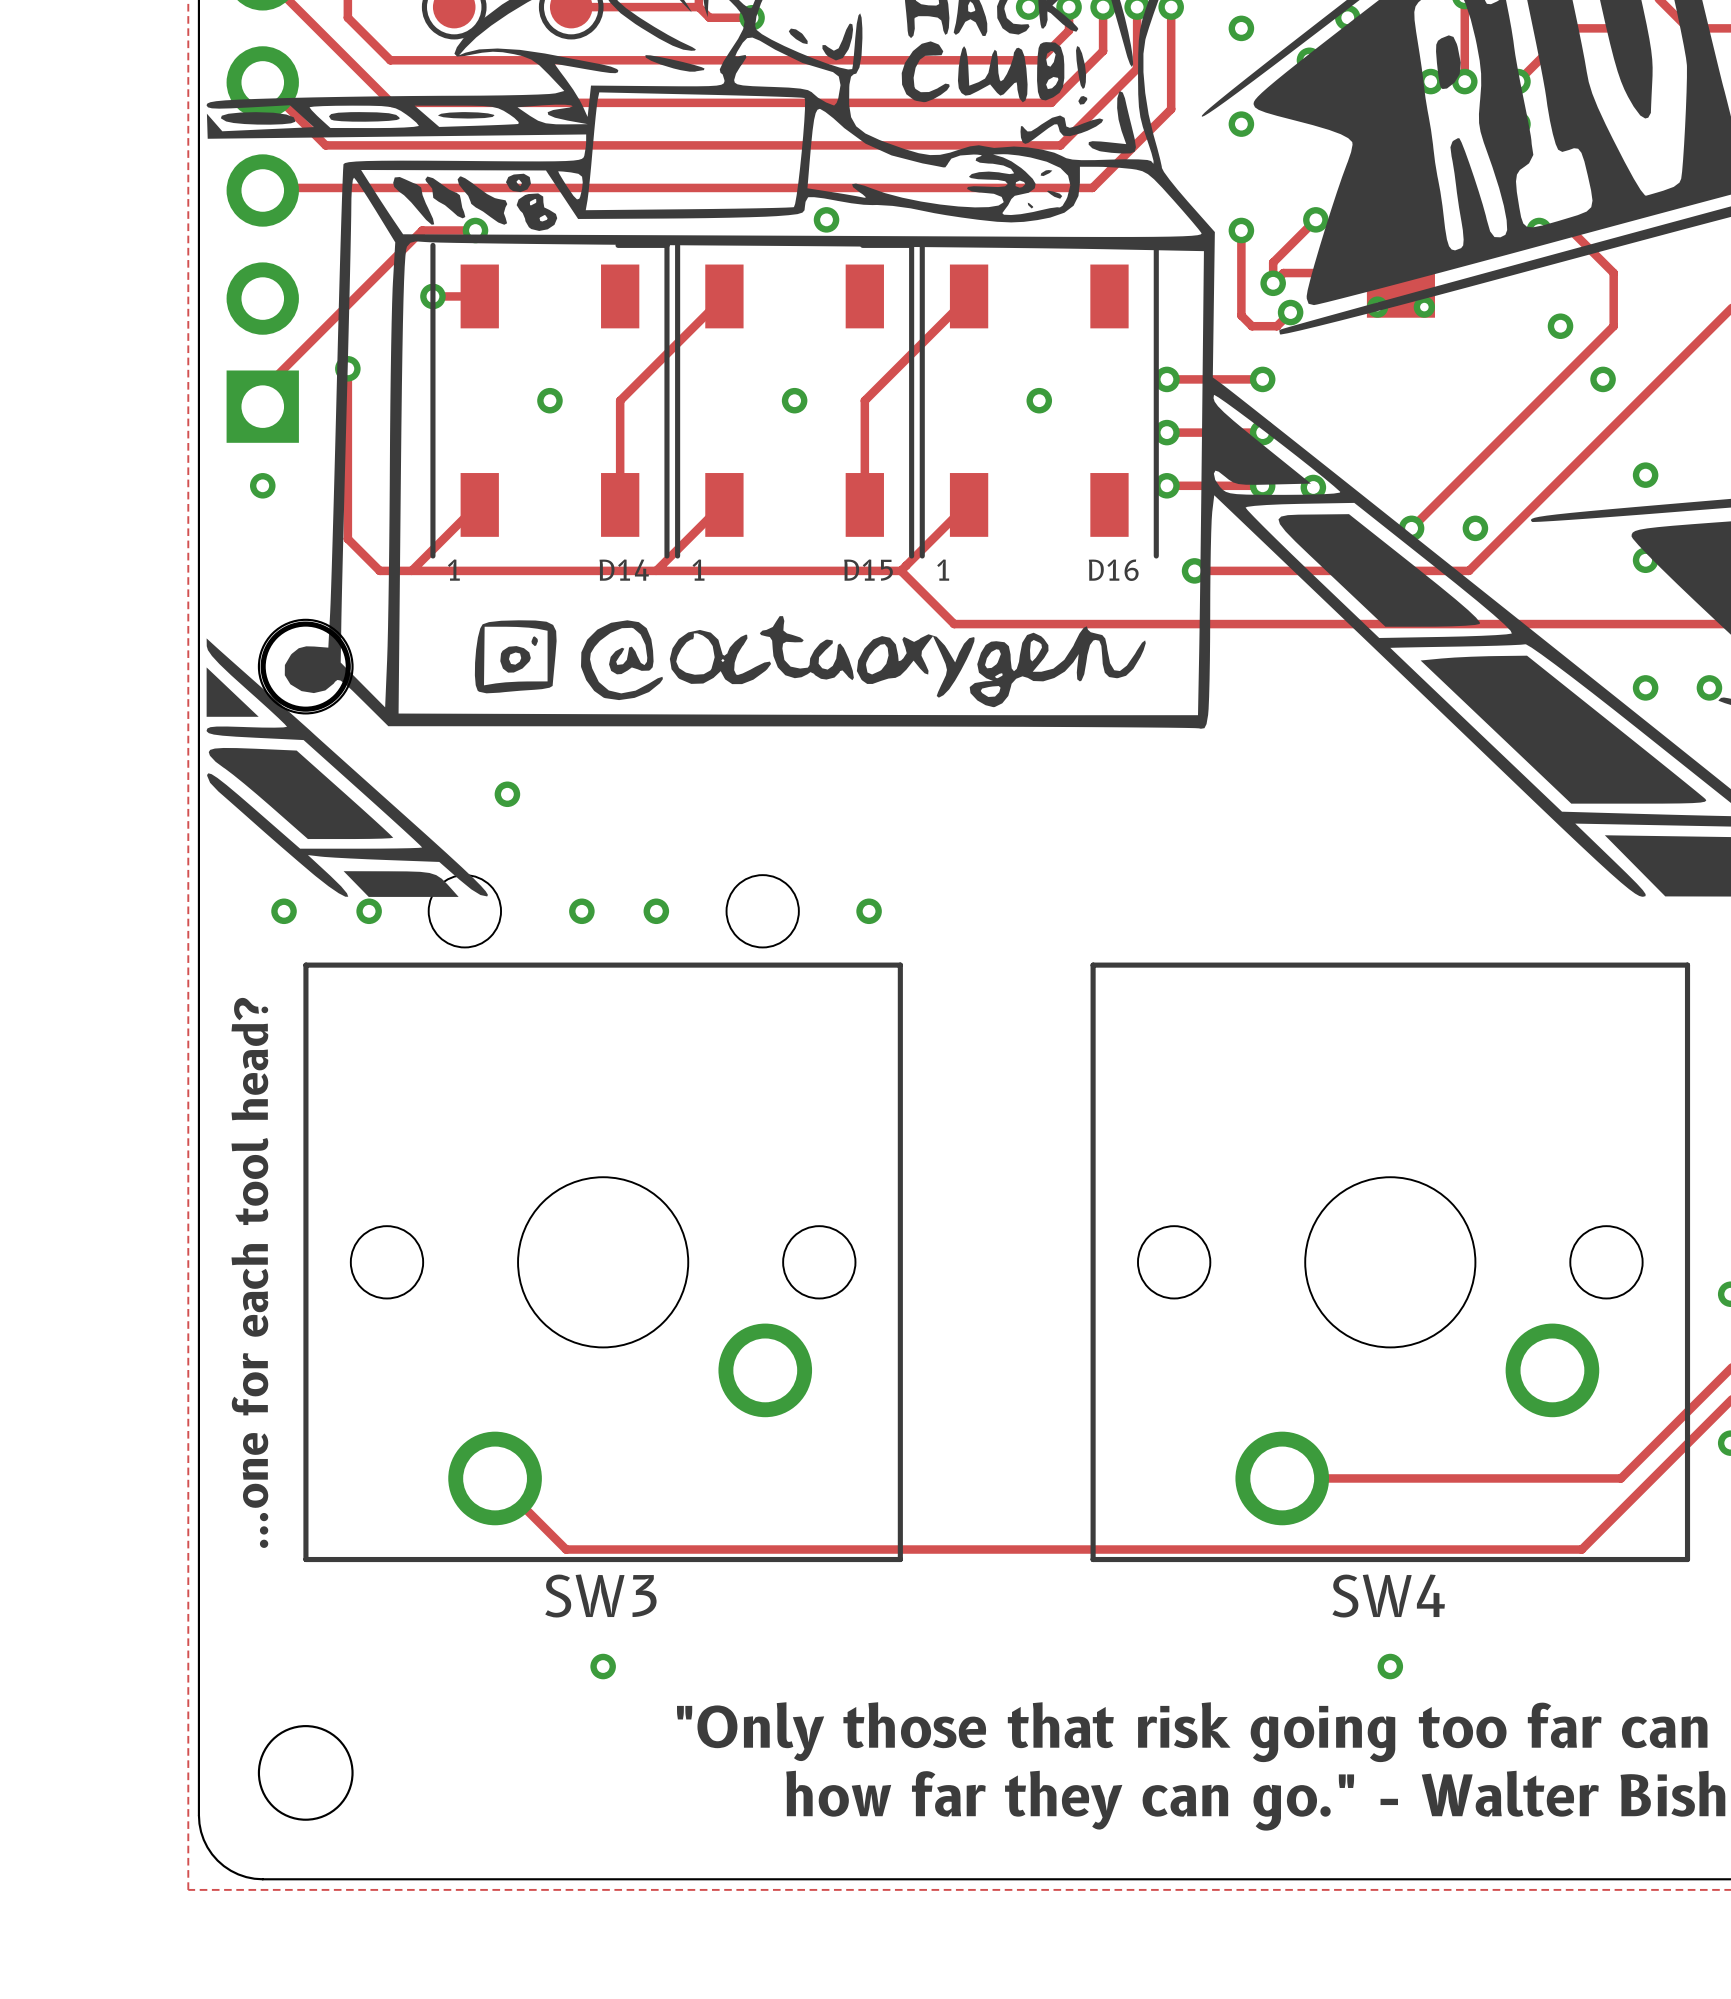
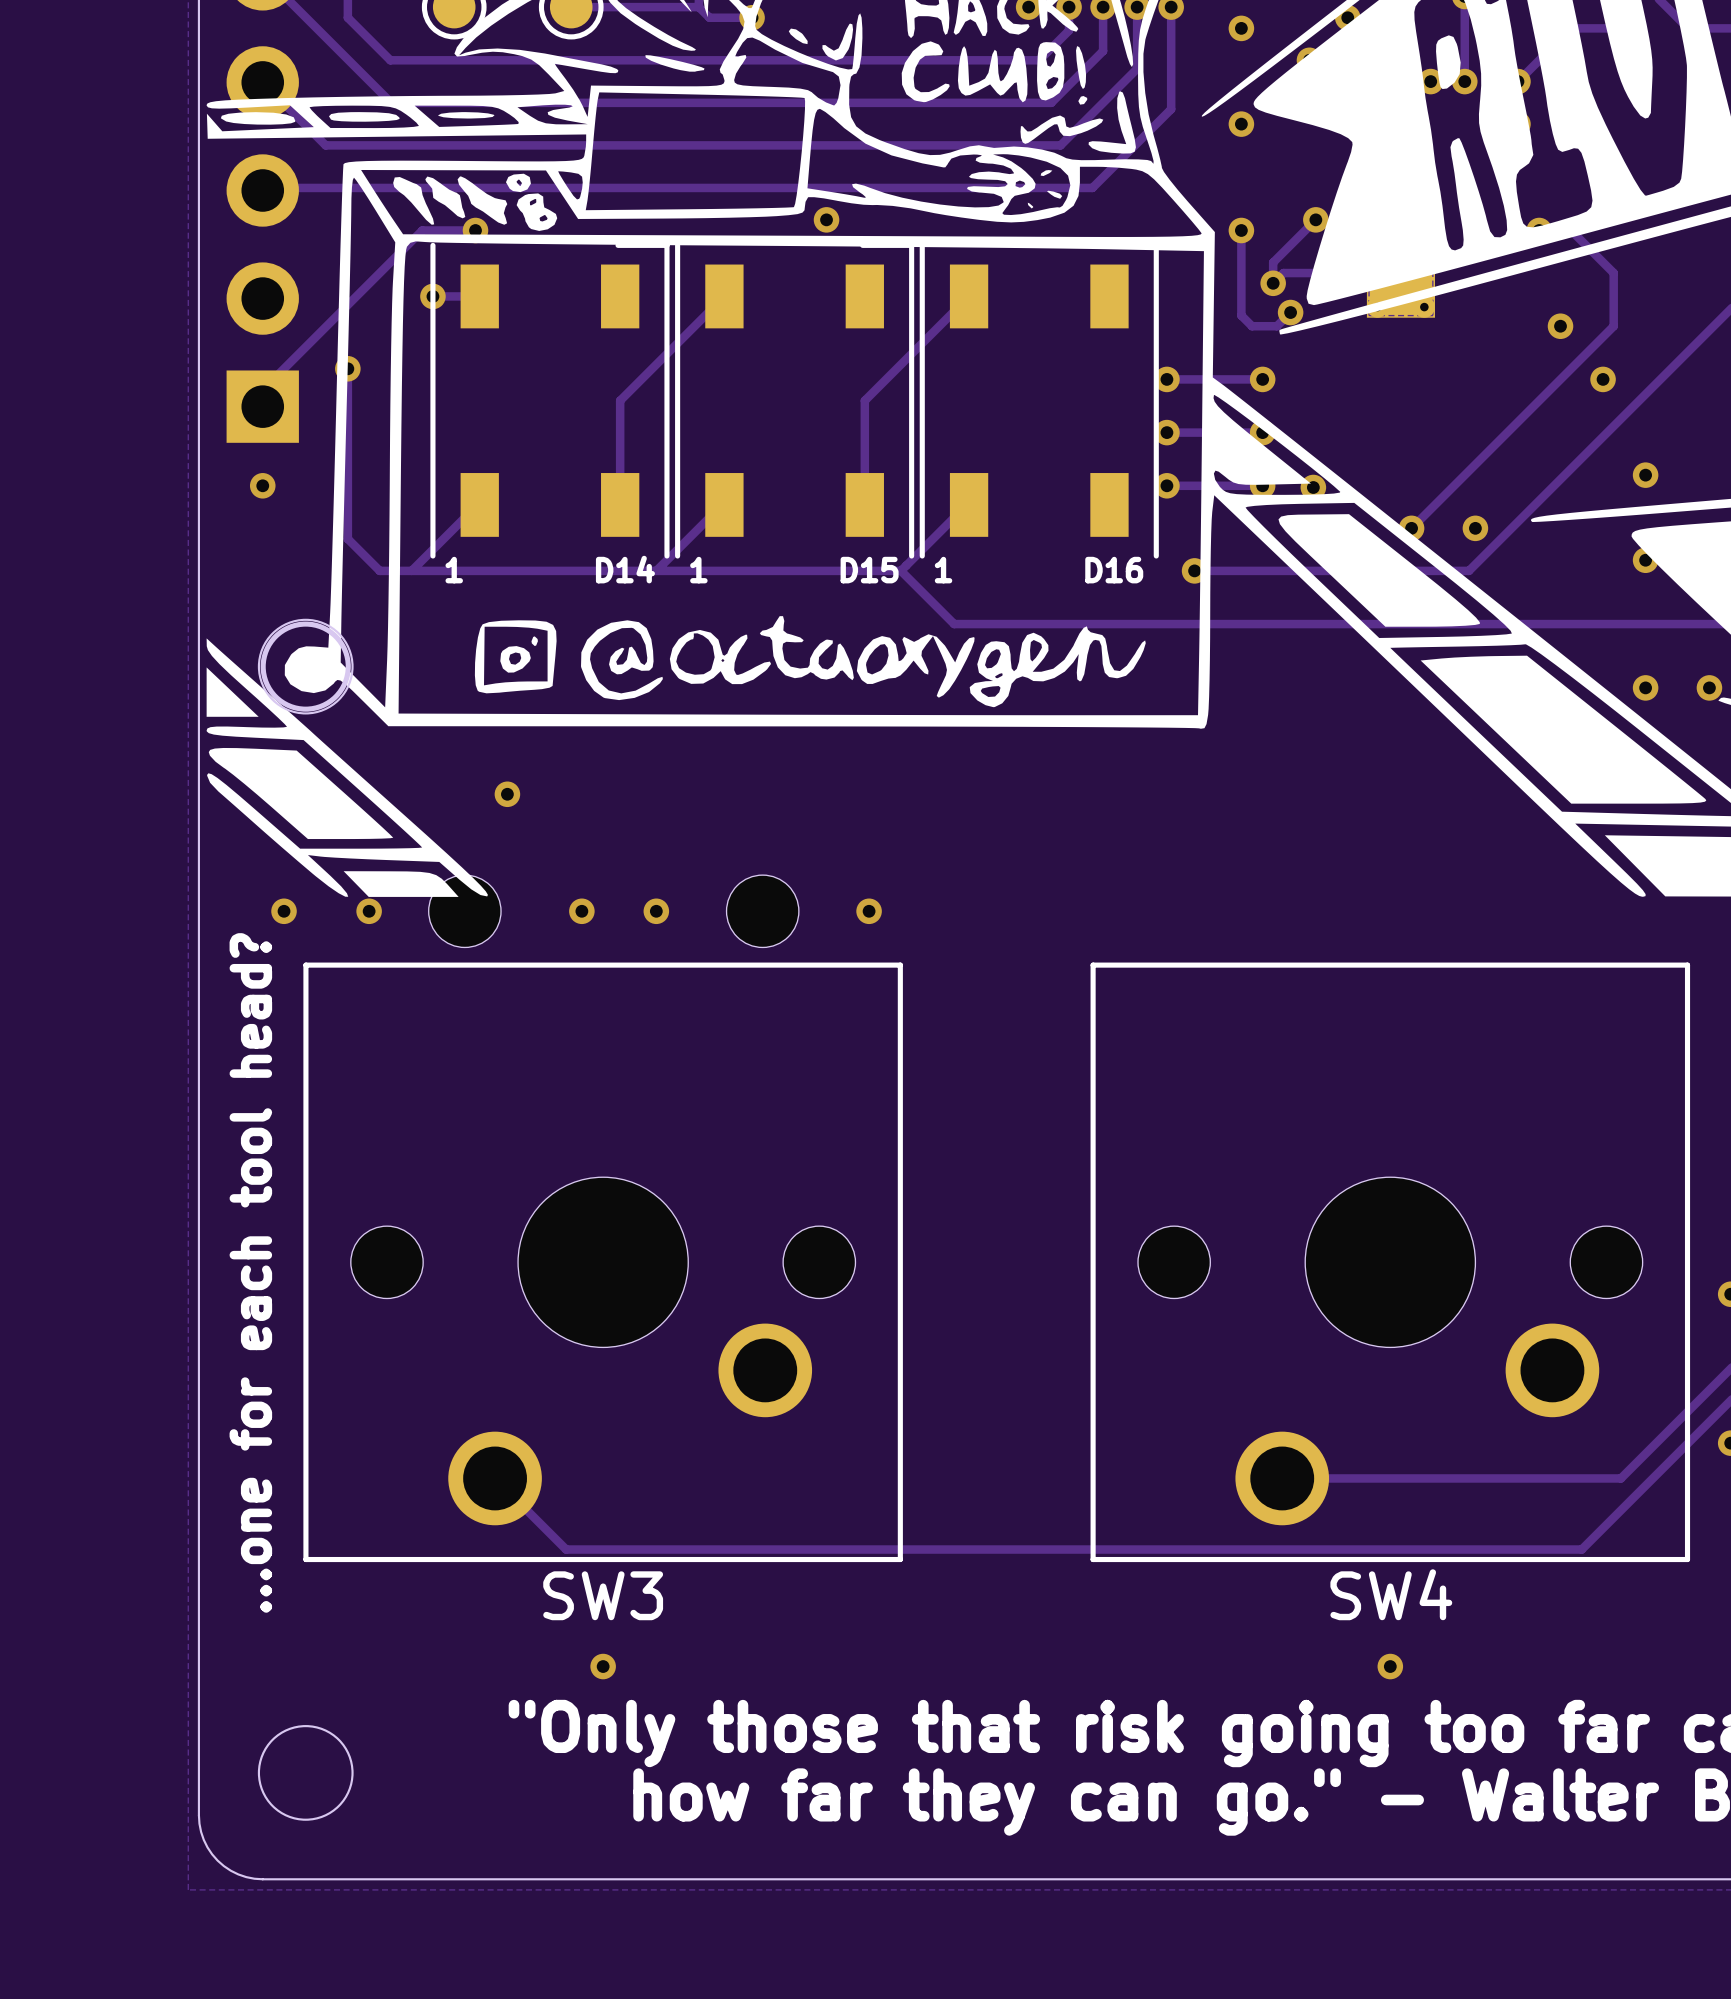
via: (549, 400) -> none
via: (794, 400) -> none
via: (1039, 400) -> none

